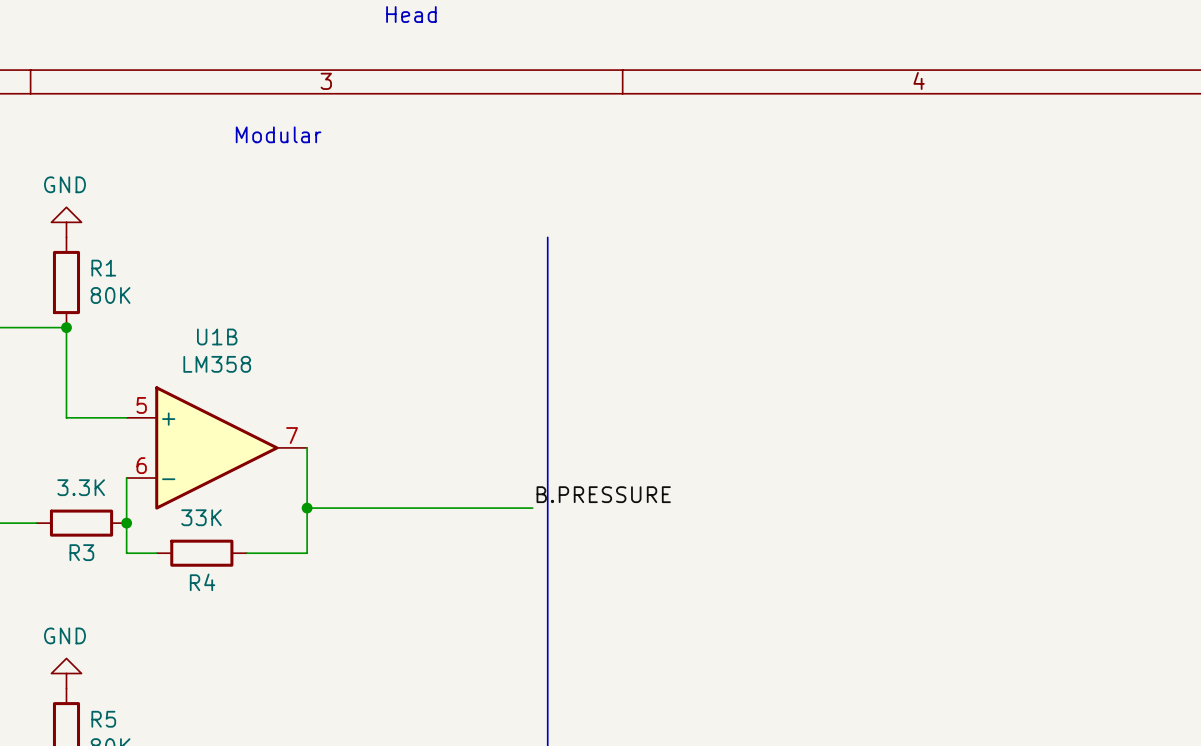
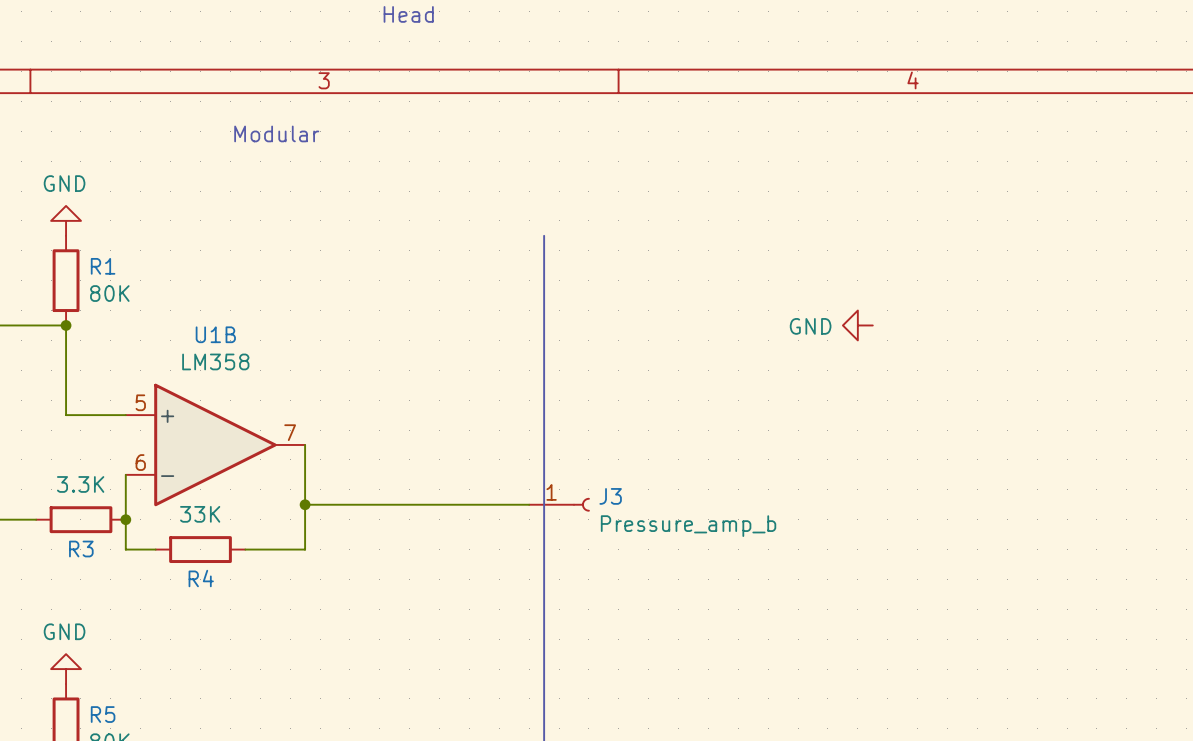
power symbol: none -> GND (857, 325)
label: B.PRESSURE (603, 494) -> none
J3: none -> Pressure_amp_b (559, 504)

